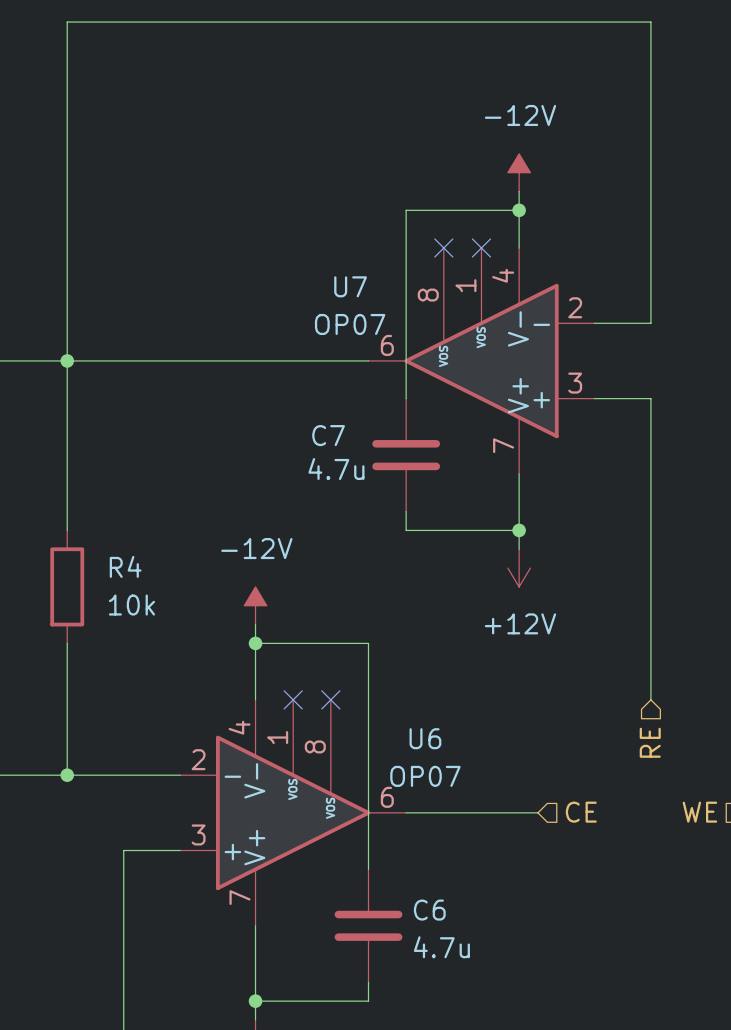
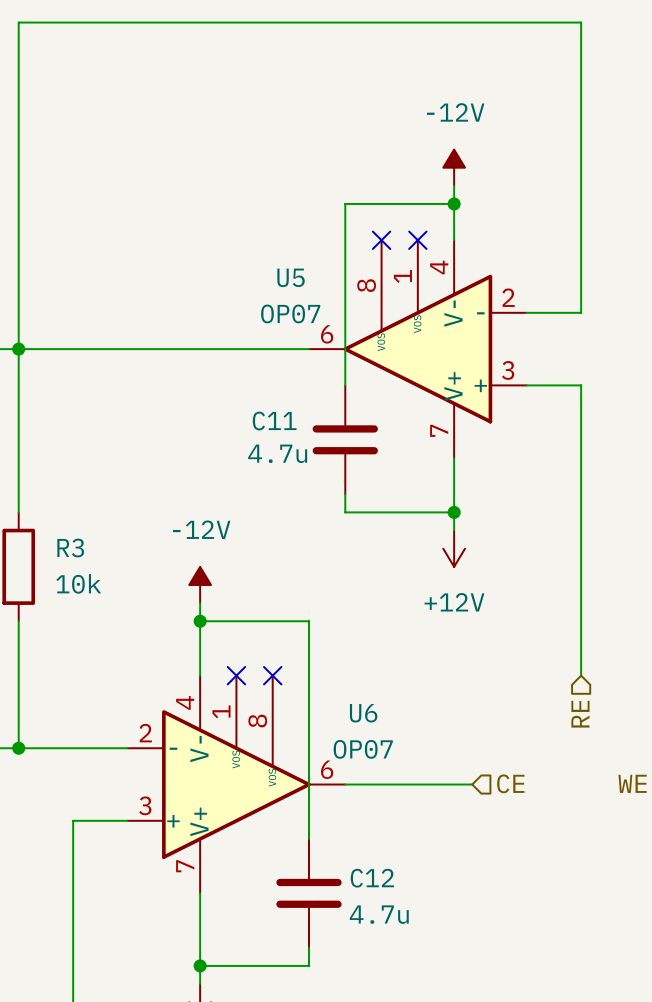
U7 name: U7 (350, 286) -> U5 (291, 277)
C7 name: C7 (328, 435) -> C11 (274, 421)
R4 name: R4 (125, 566) -> R3 (70, 548)
C6 name: C6 (429, 910) -> C12 (372, 878)

